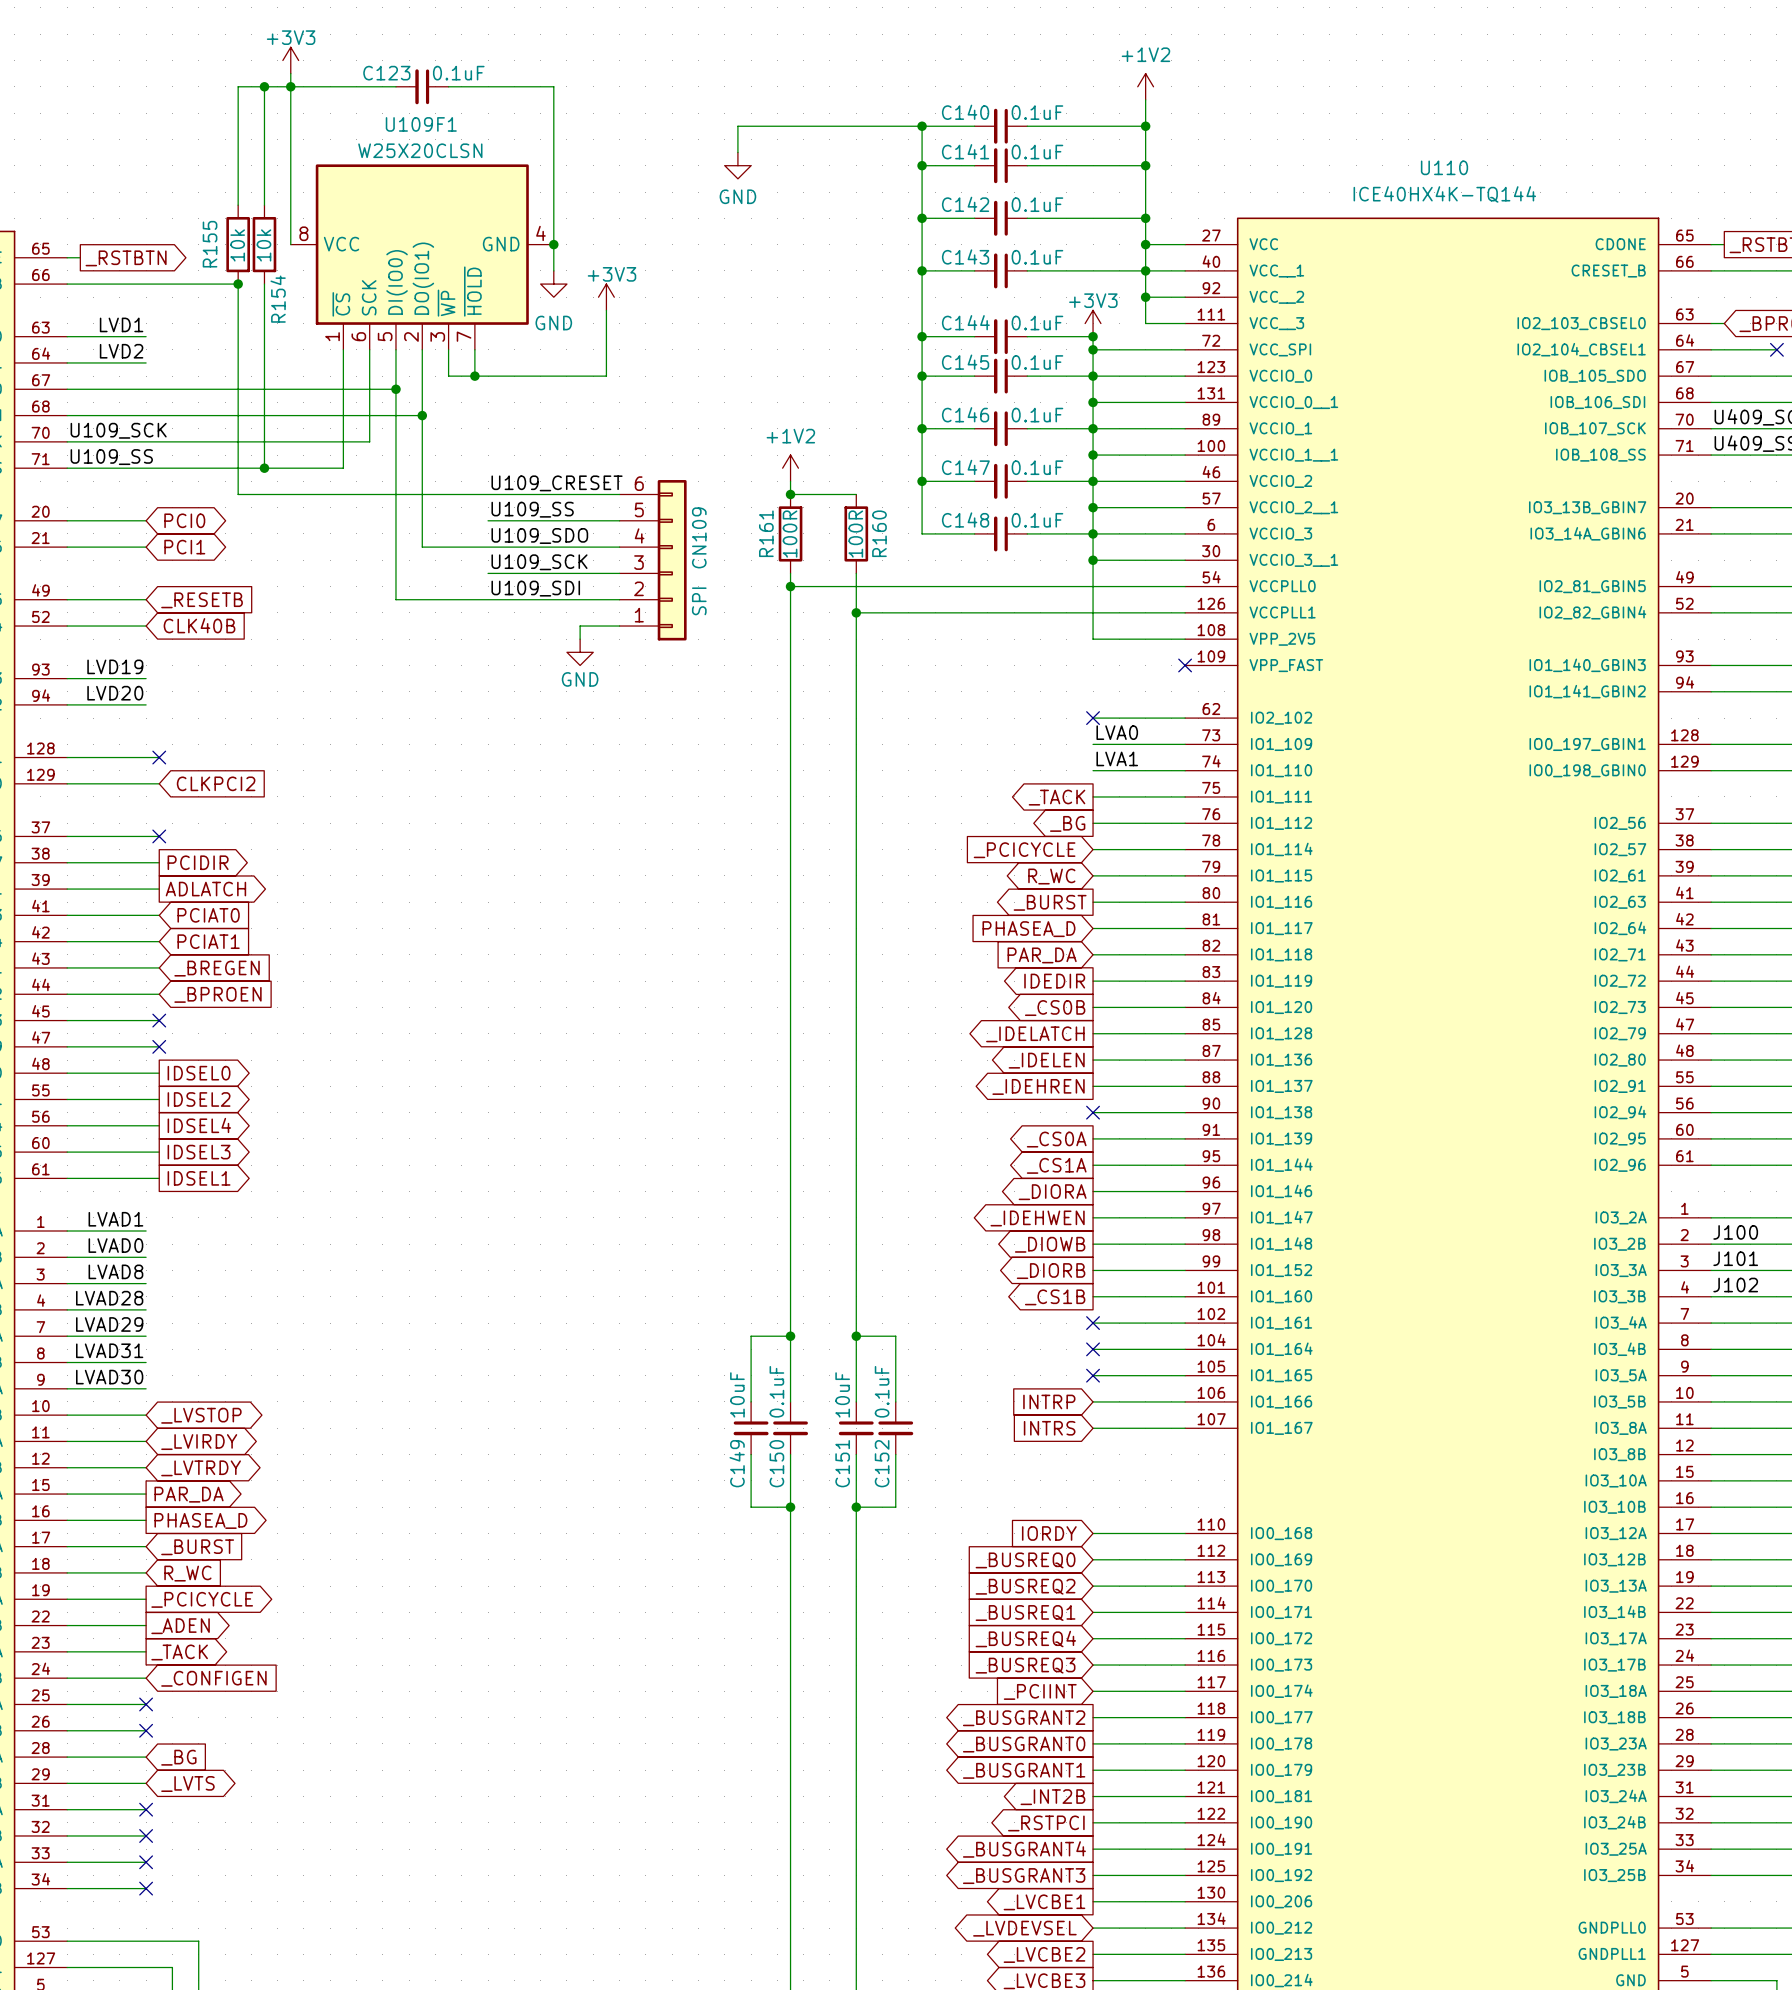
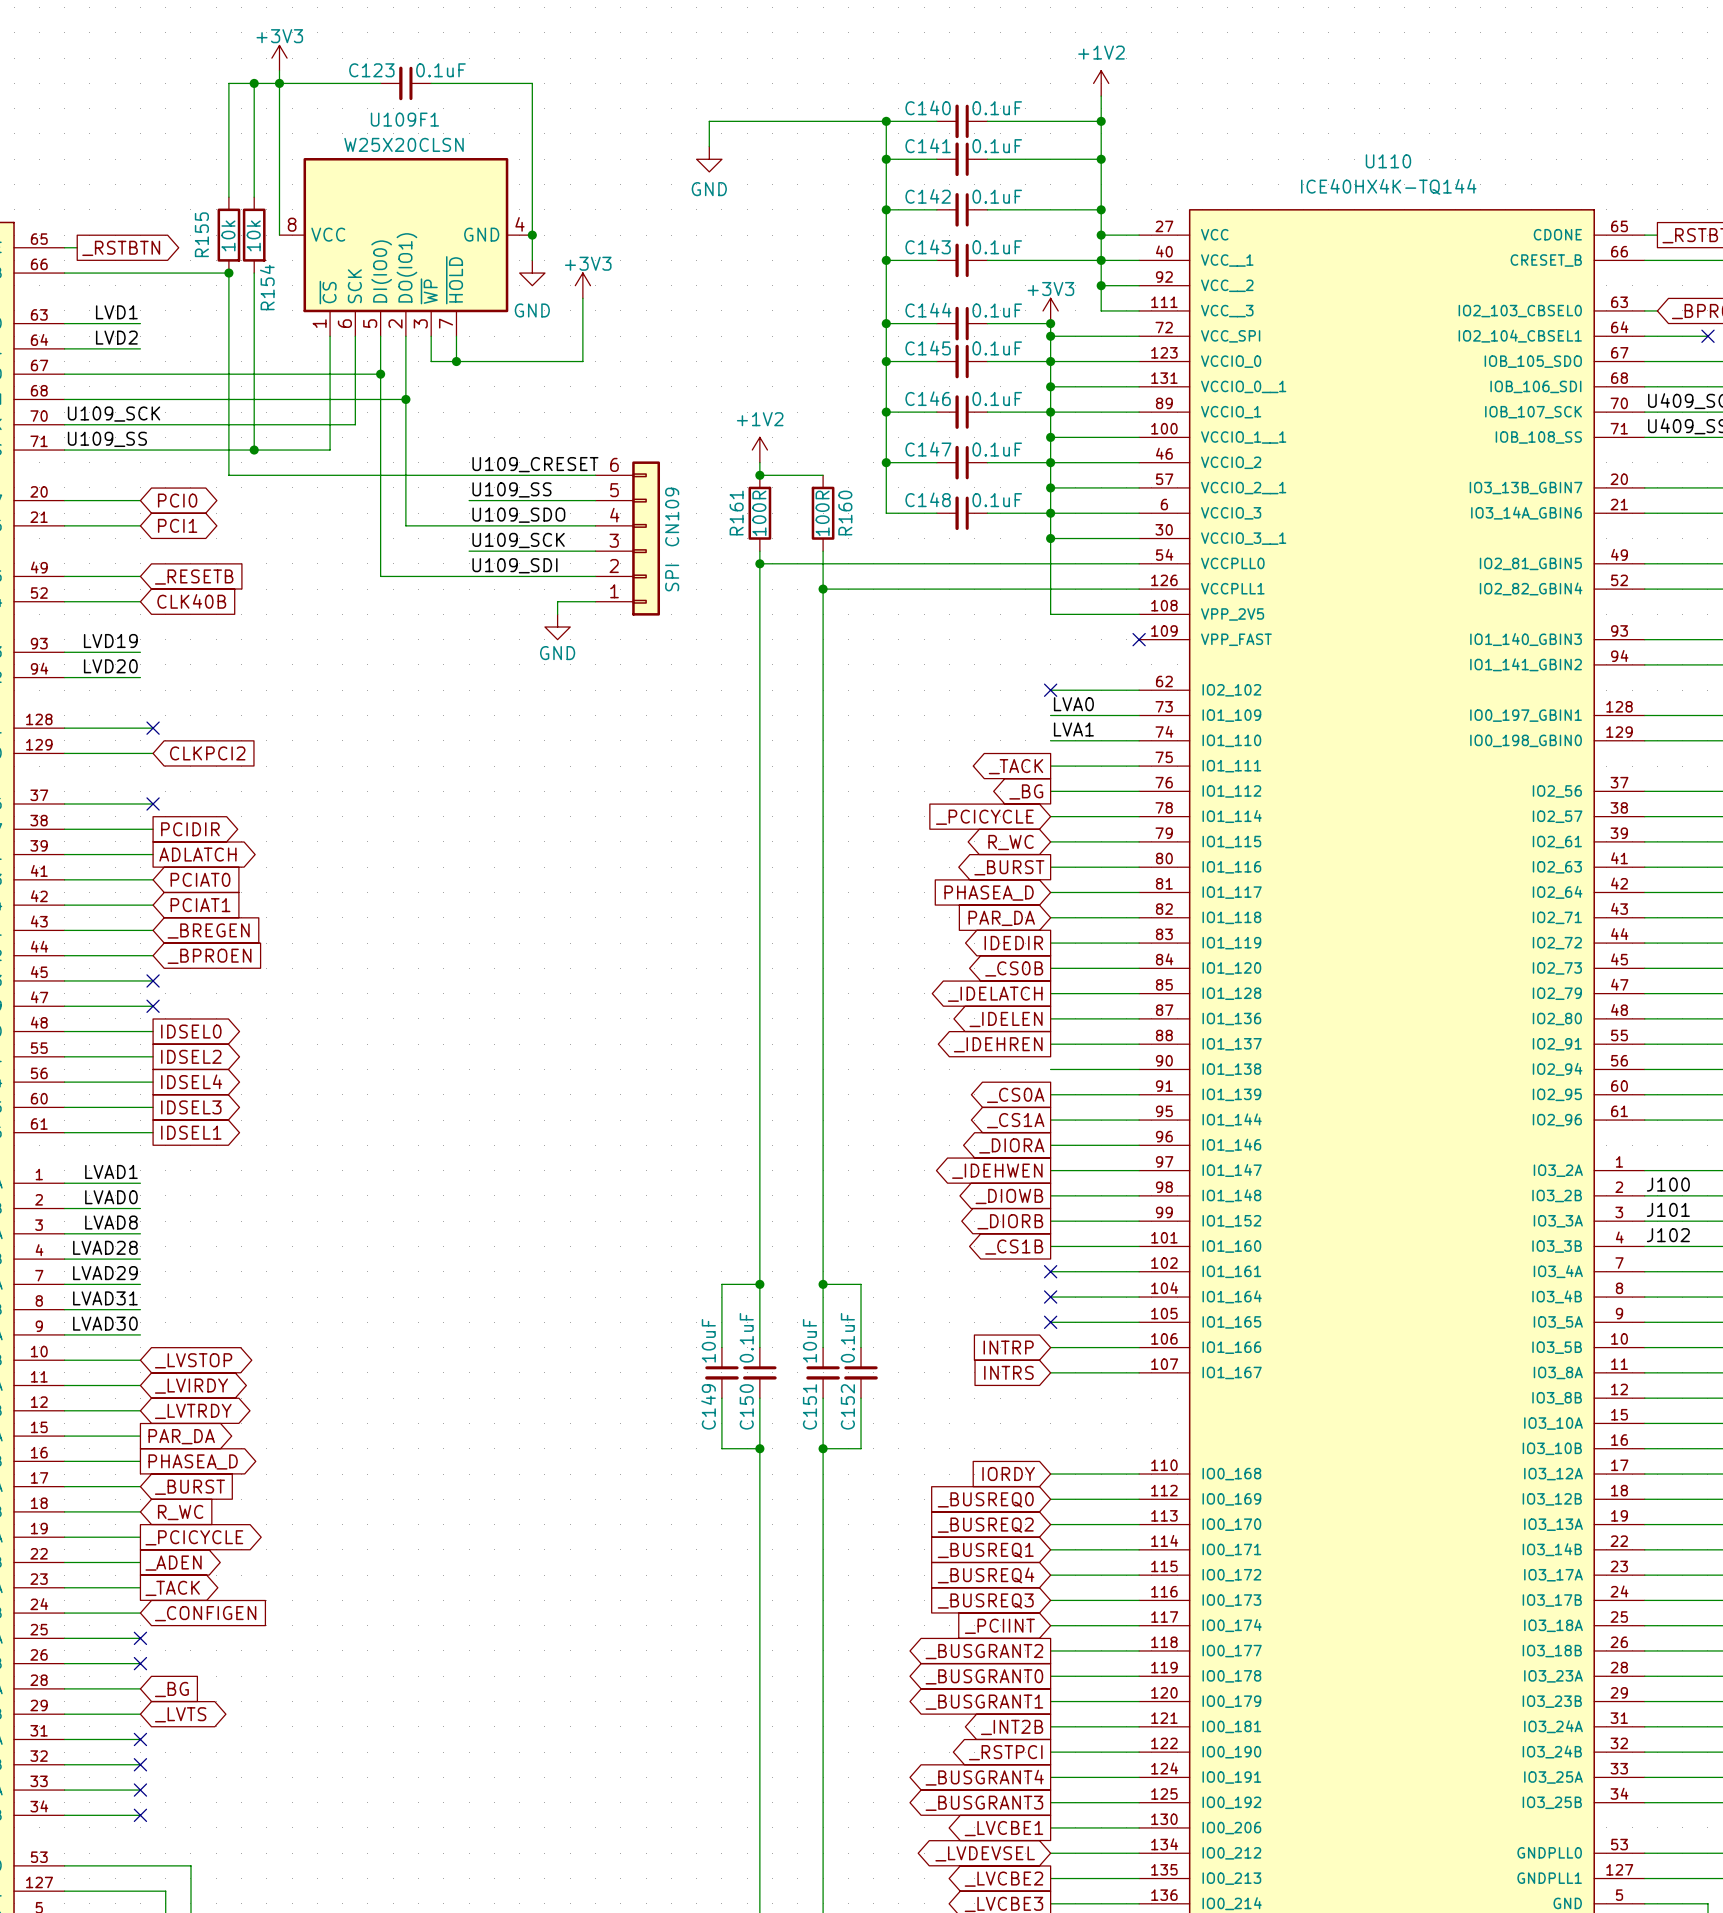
no-connect mark: (1093, 1112) -> none

